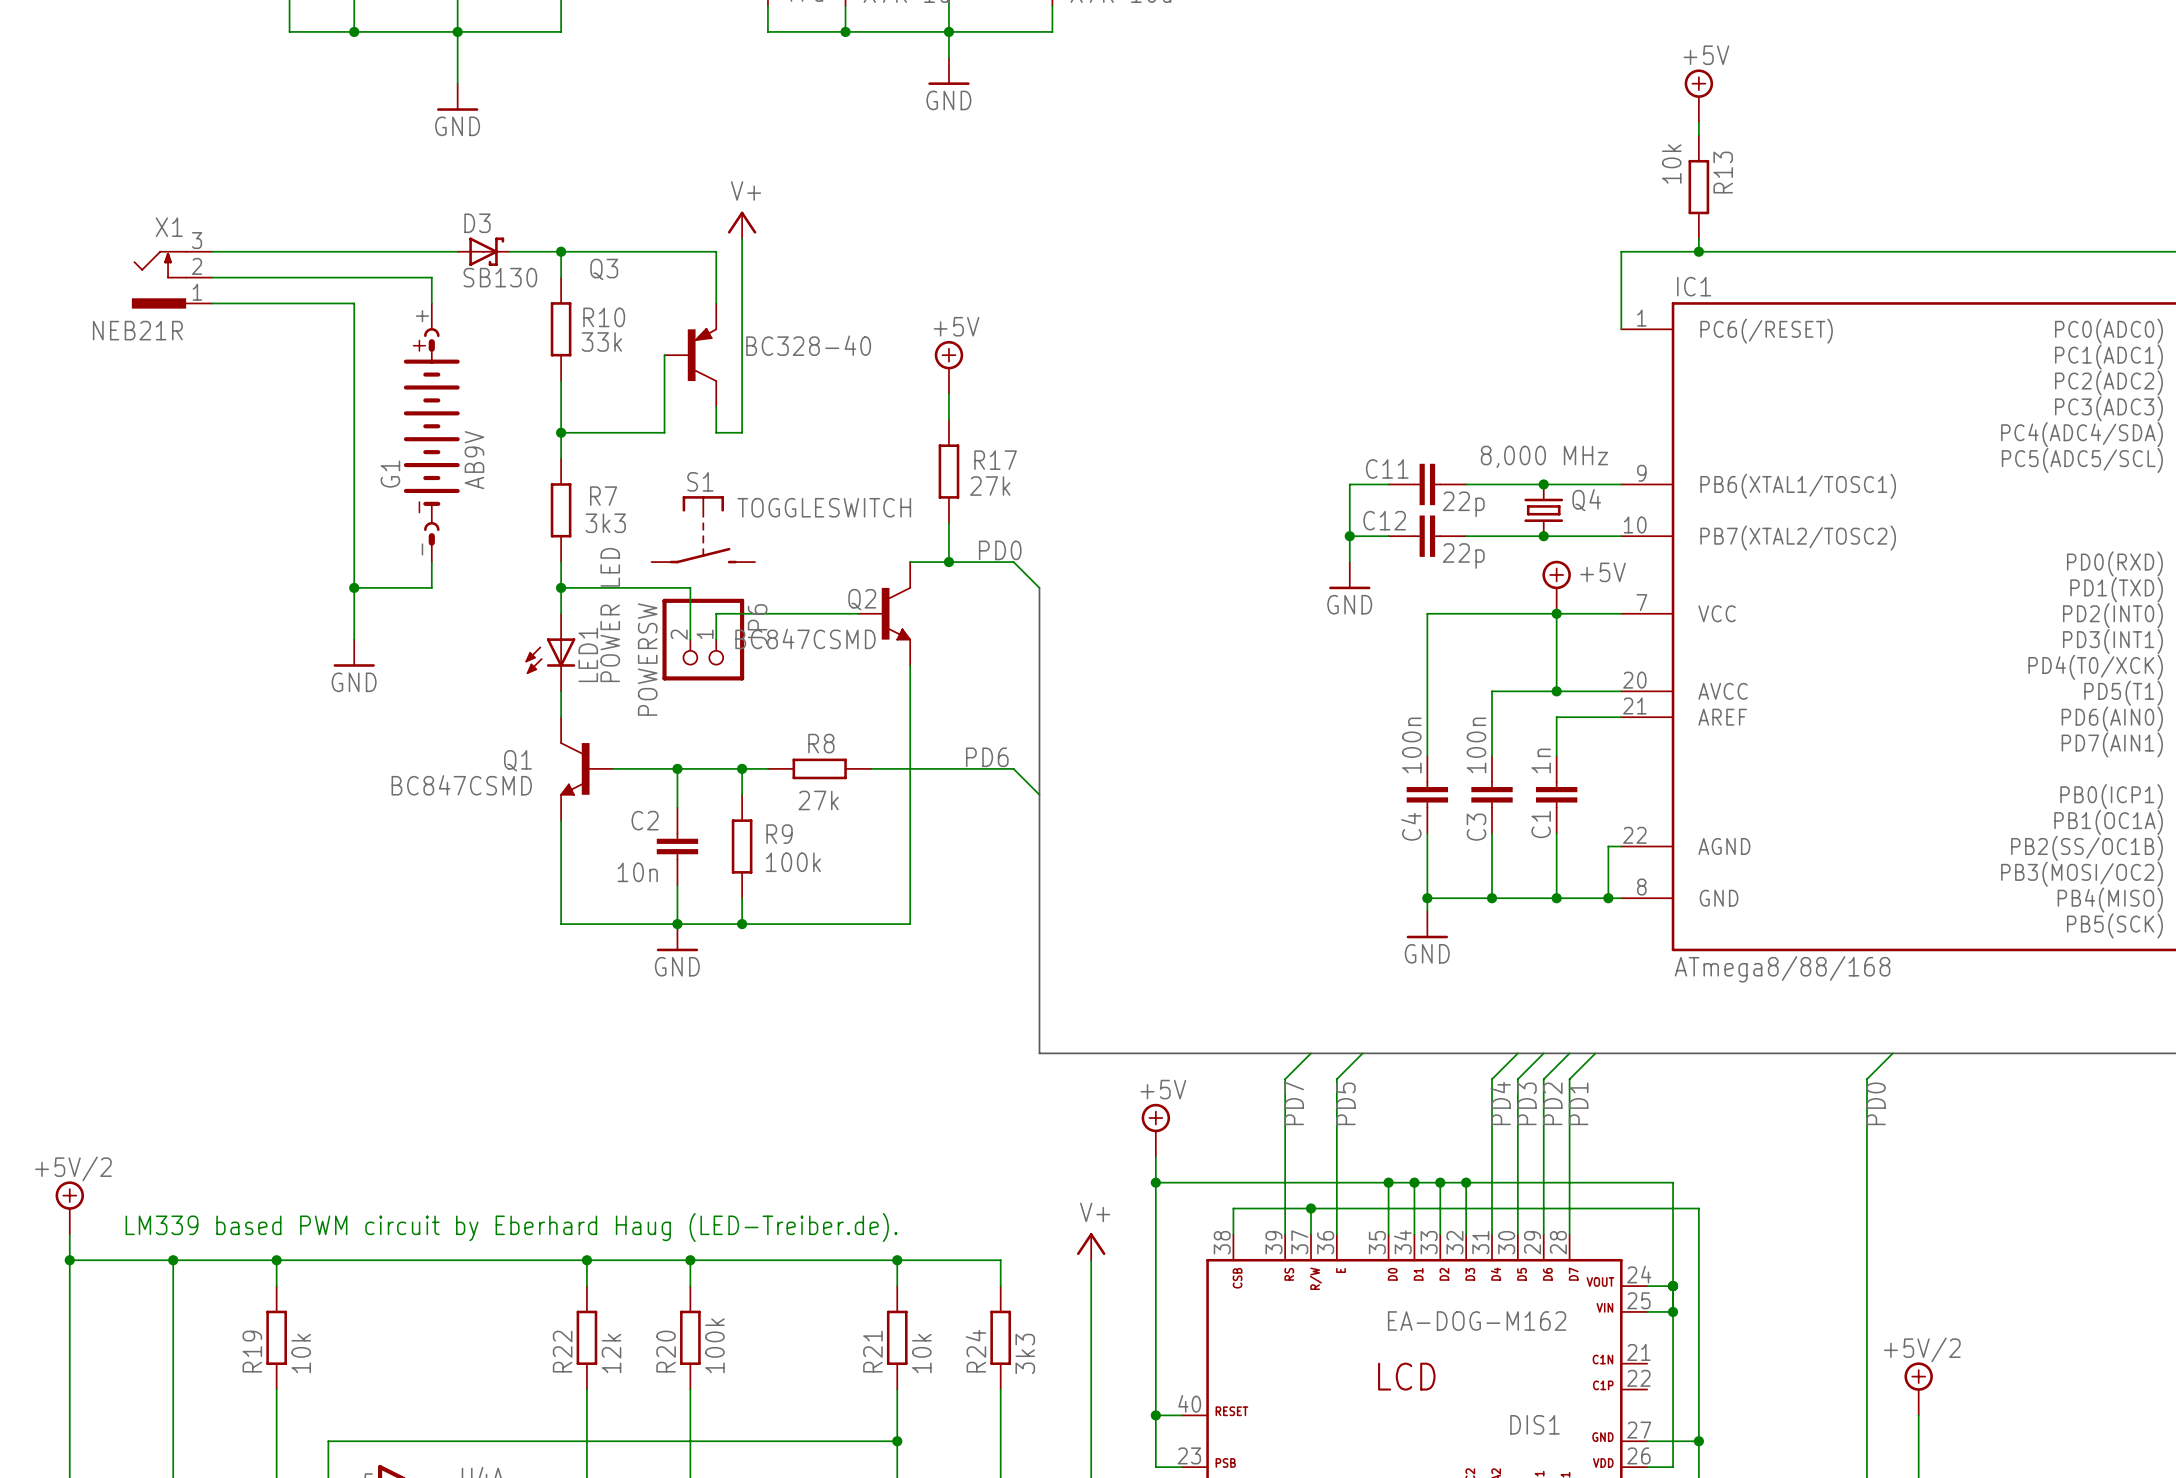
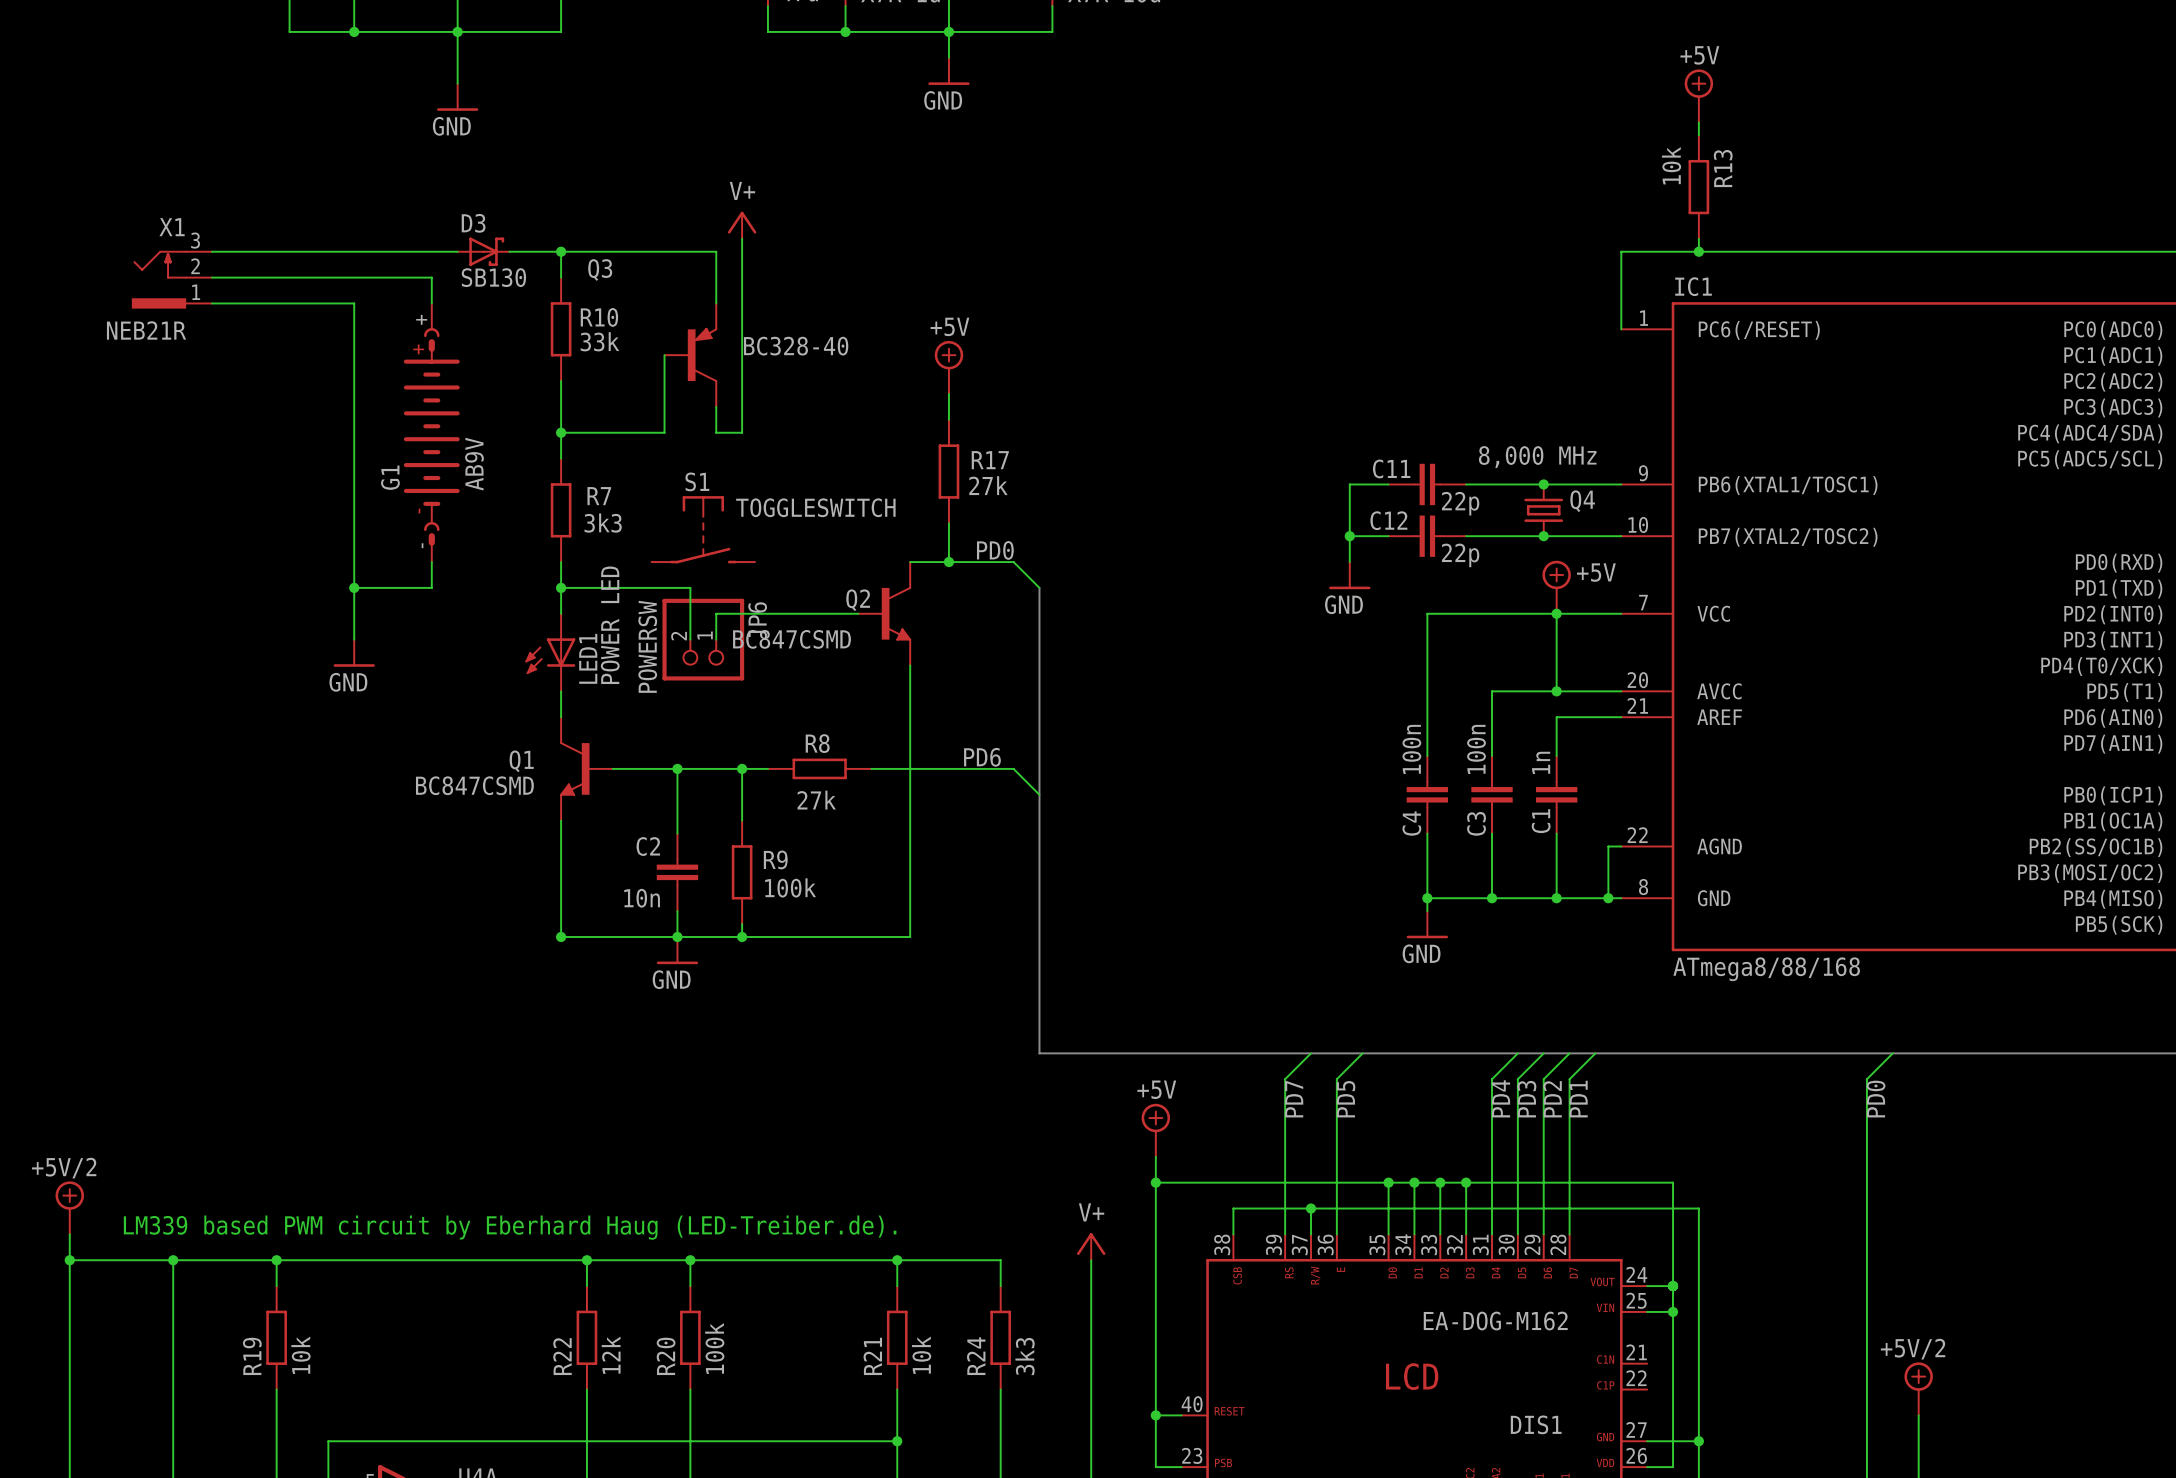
C2 position: (677, 846) -> (677, 872)
R9 position: (742, 846) -> (742, 872)
wire: (561, 924) (910, 924) -> (561, 924) (561, 937) (910, 937) (910, 924)
junction position: (677, 924) -> (677, 937)
junction position: (742, 924) -> (742, 937)
junction: none -> (561, 937)
power symbol position: GND (677, 937) -> GND (677, 950)

